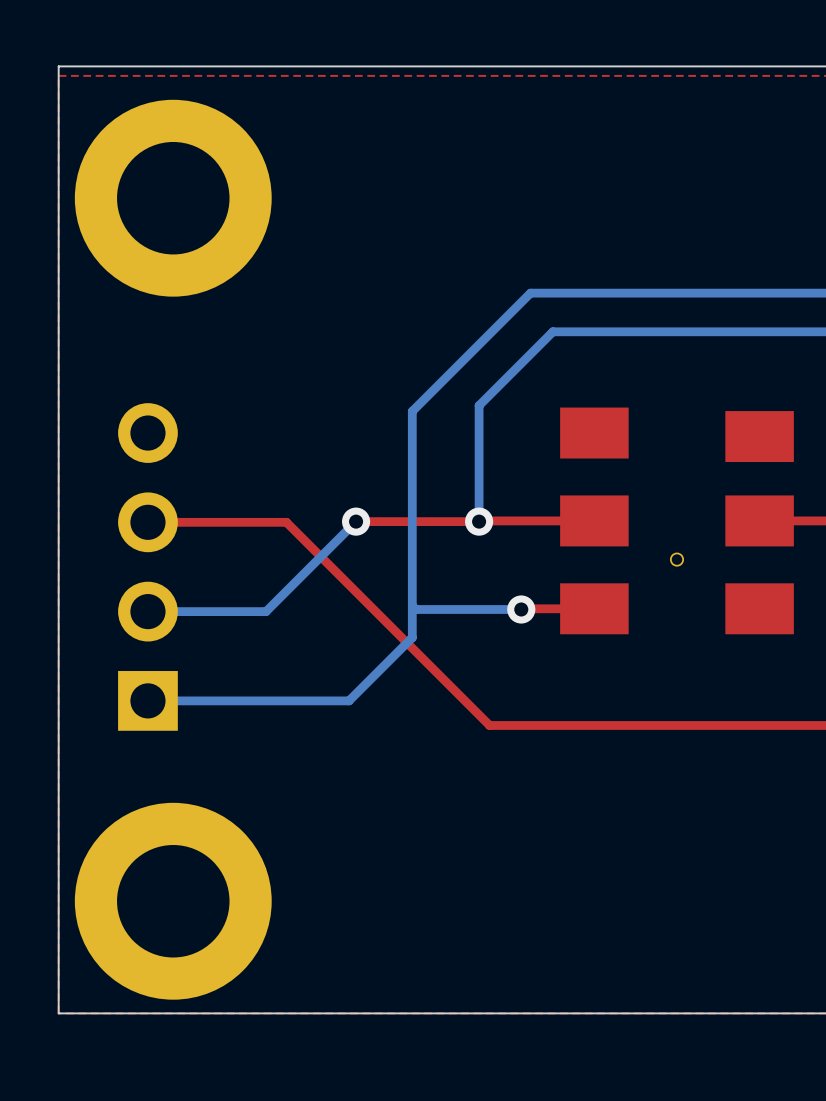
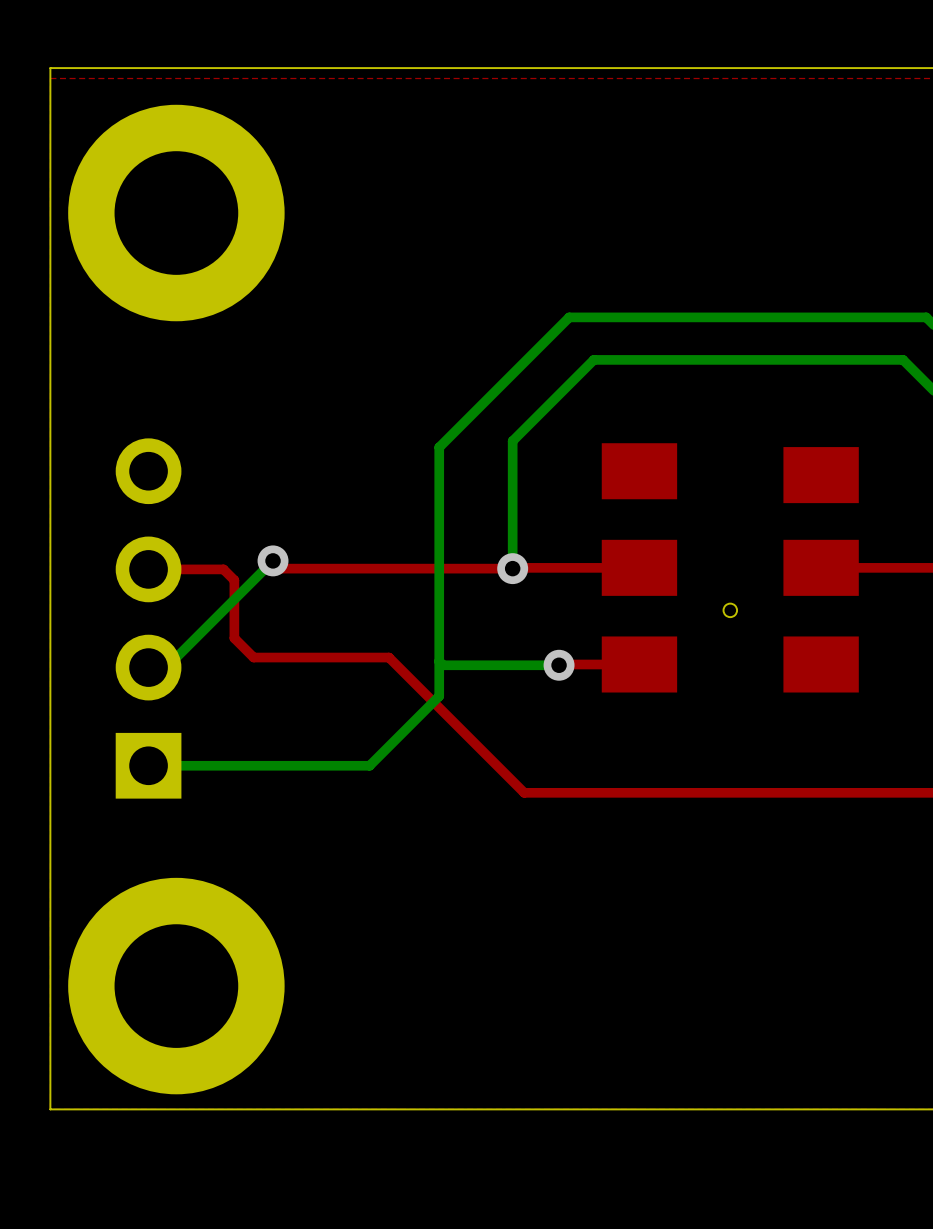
top track: none -> (273, 560) (280, 568) (377, 568)
bottom track: (356, 521) (266, 611) (164, 611) -> (273, 560) (166, 667)
via position: (356, 521) -> (273, 560)
top track: (216, 522) (286, 522) (366, 602) -> (223, 569) (234, 580) (234, 638) (253, 657) (388, 657)

